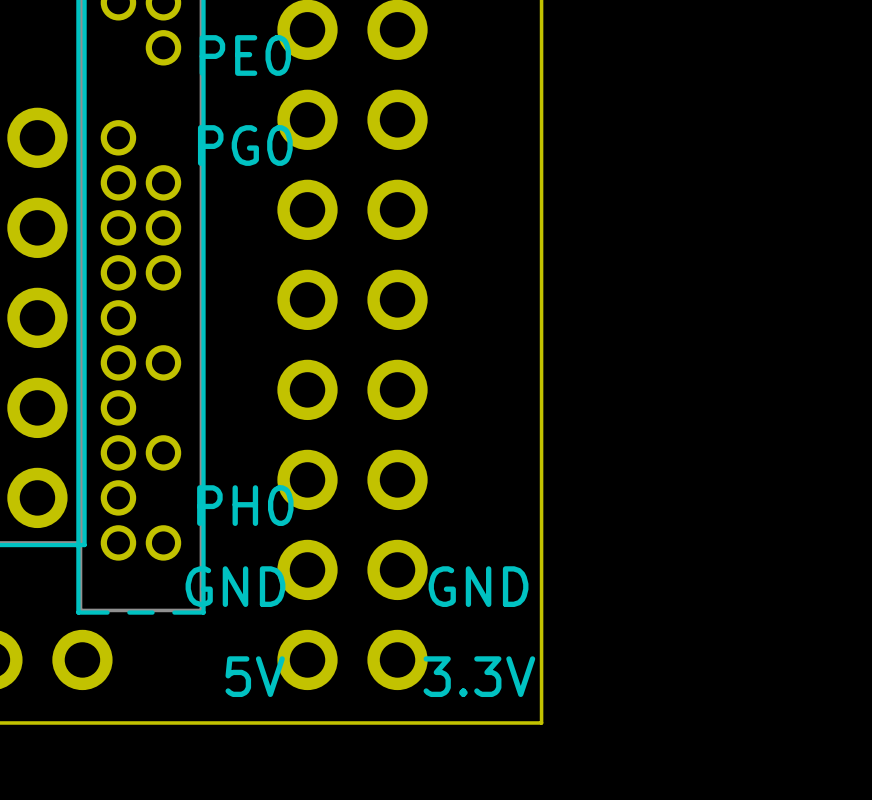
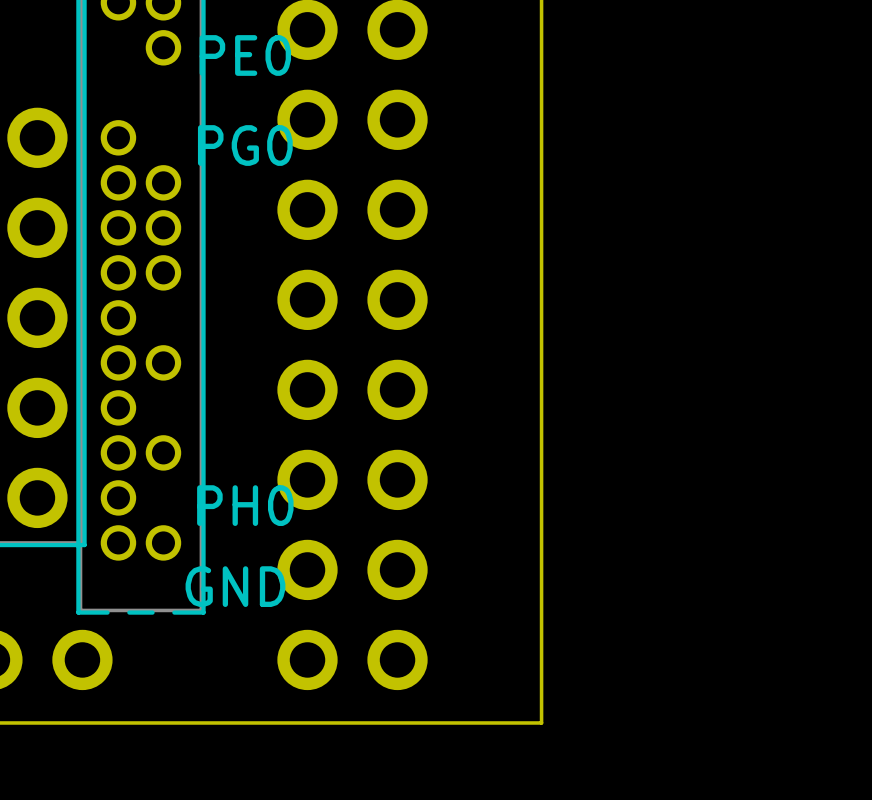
text: GND (478, 586) -> none
text: 5V (255, 676) -> none
text: 3.3V (479, 676) -> none

